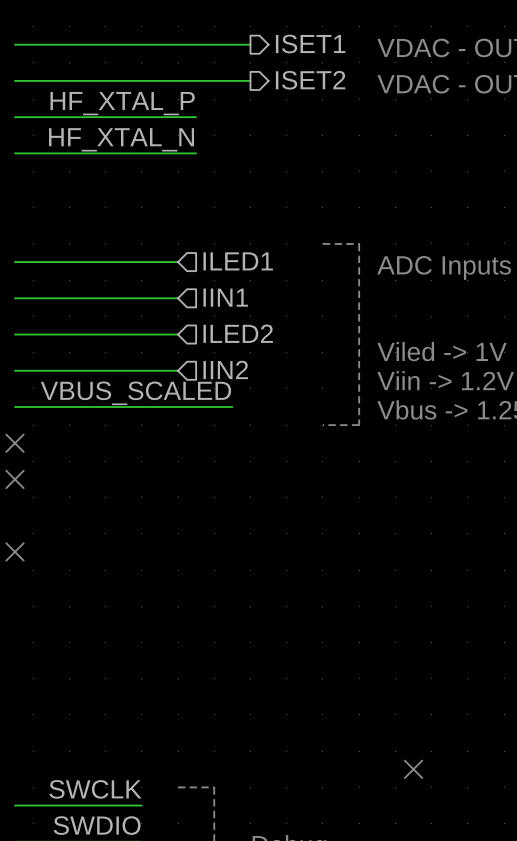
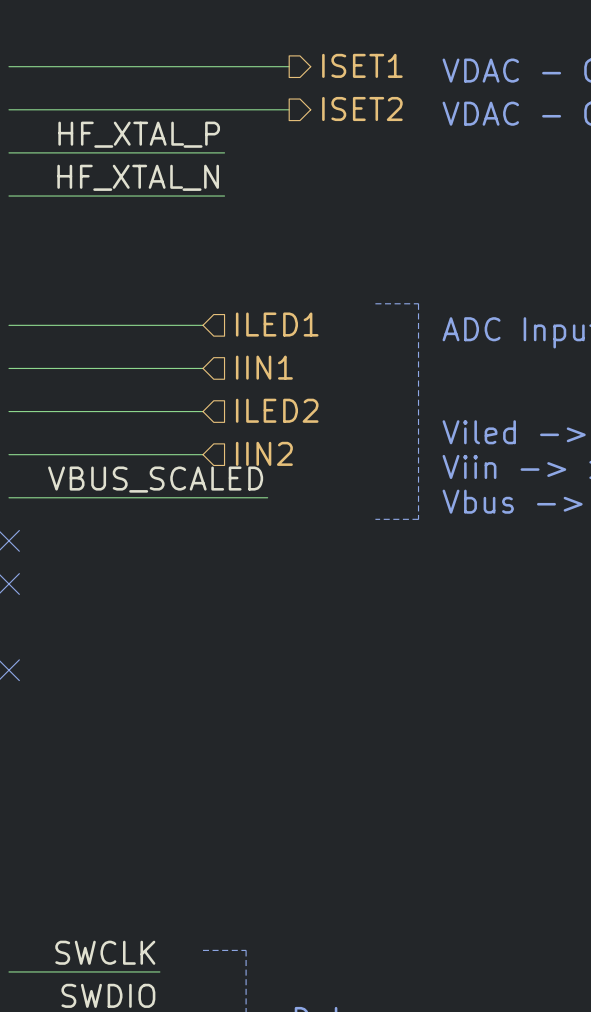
no-connect mark: (413, 769) -> none

